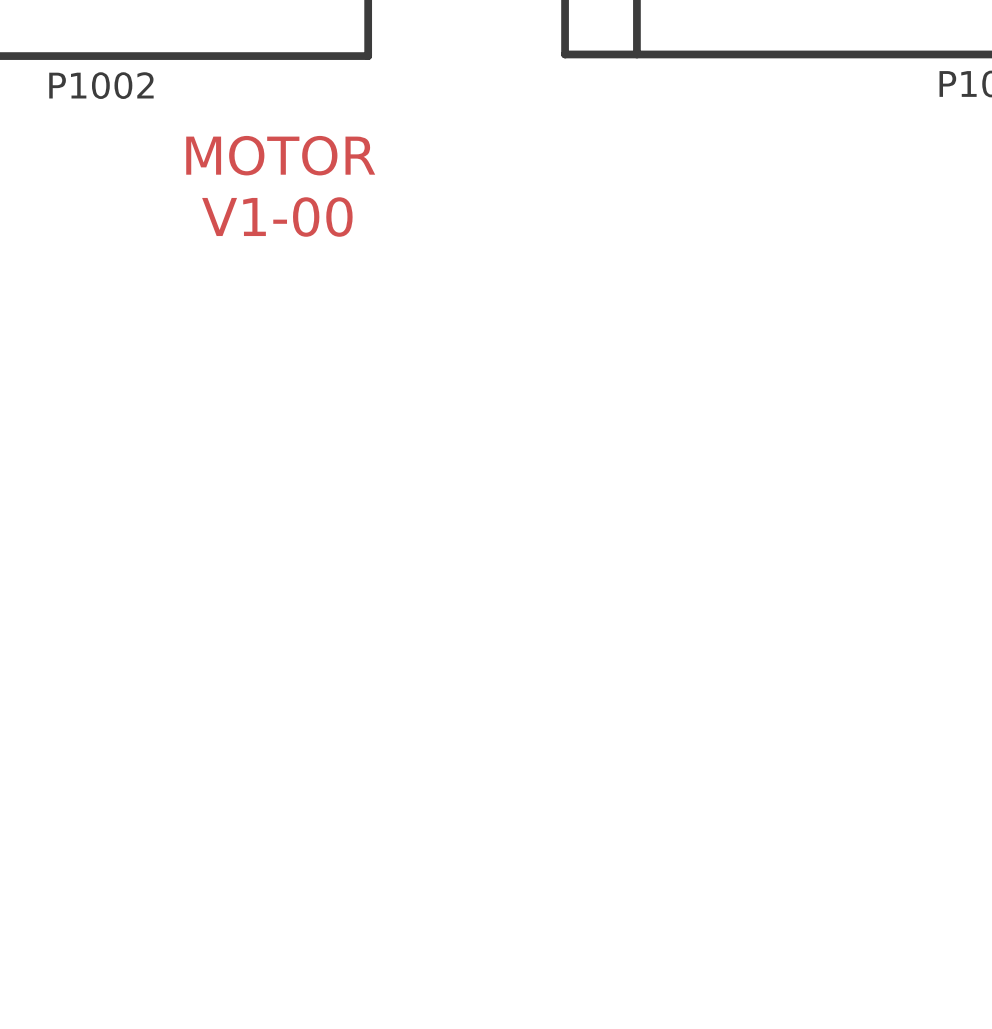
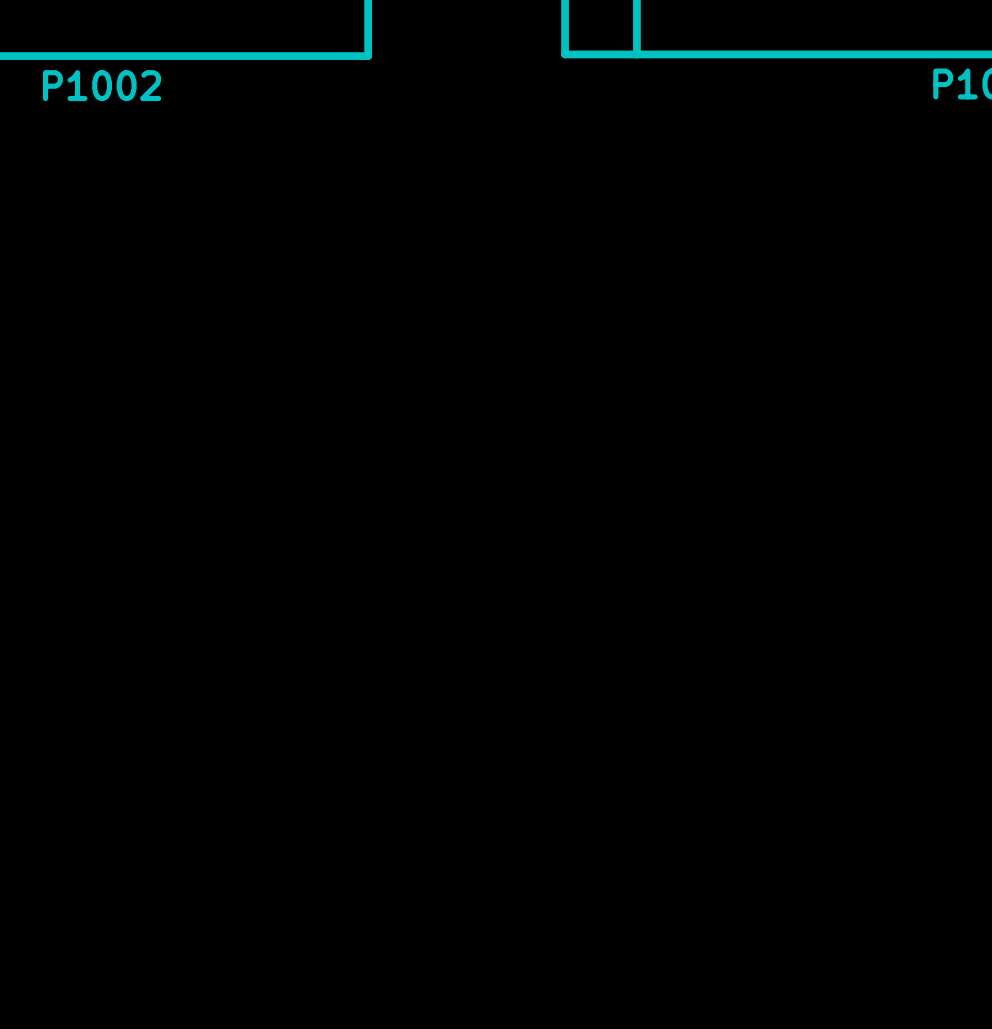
text: MOTOR (280, 155) -> none
text: V1-00 (277, 217) -> none

